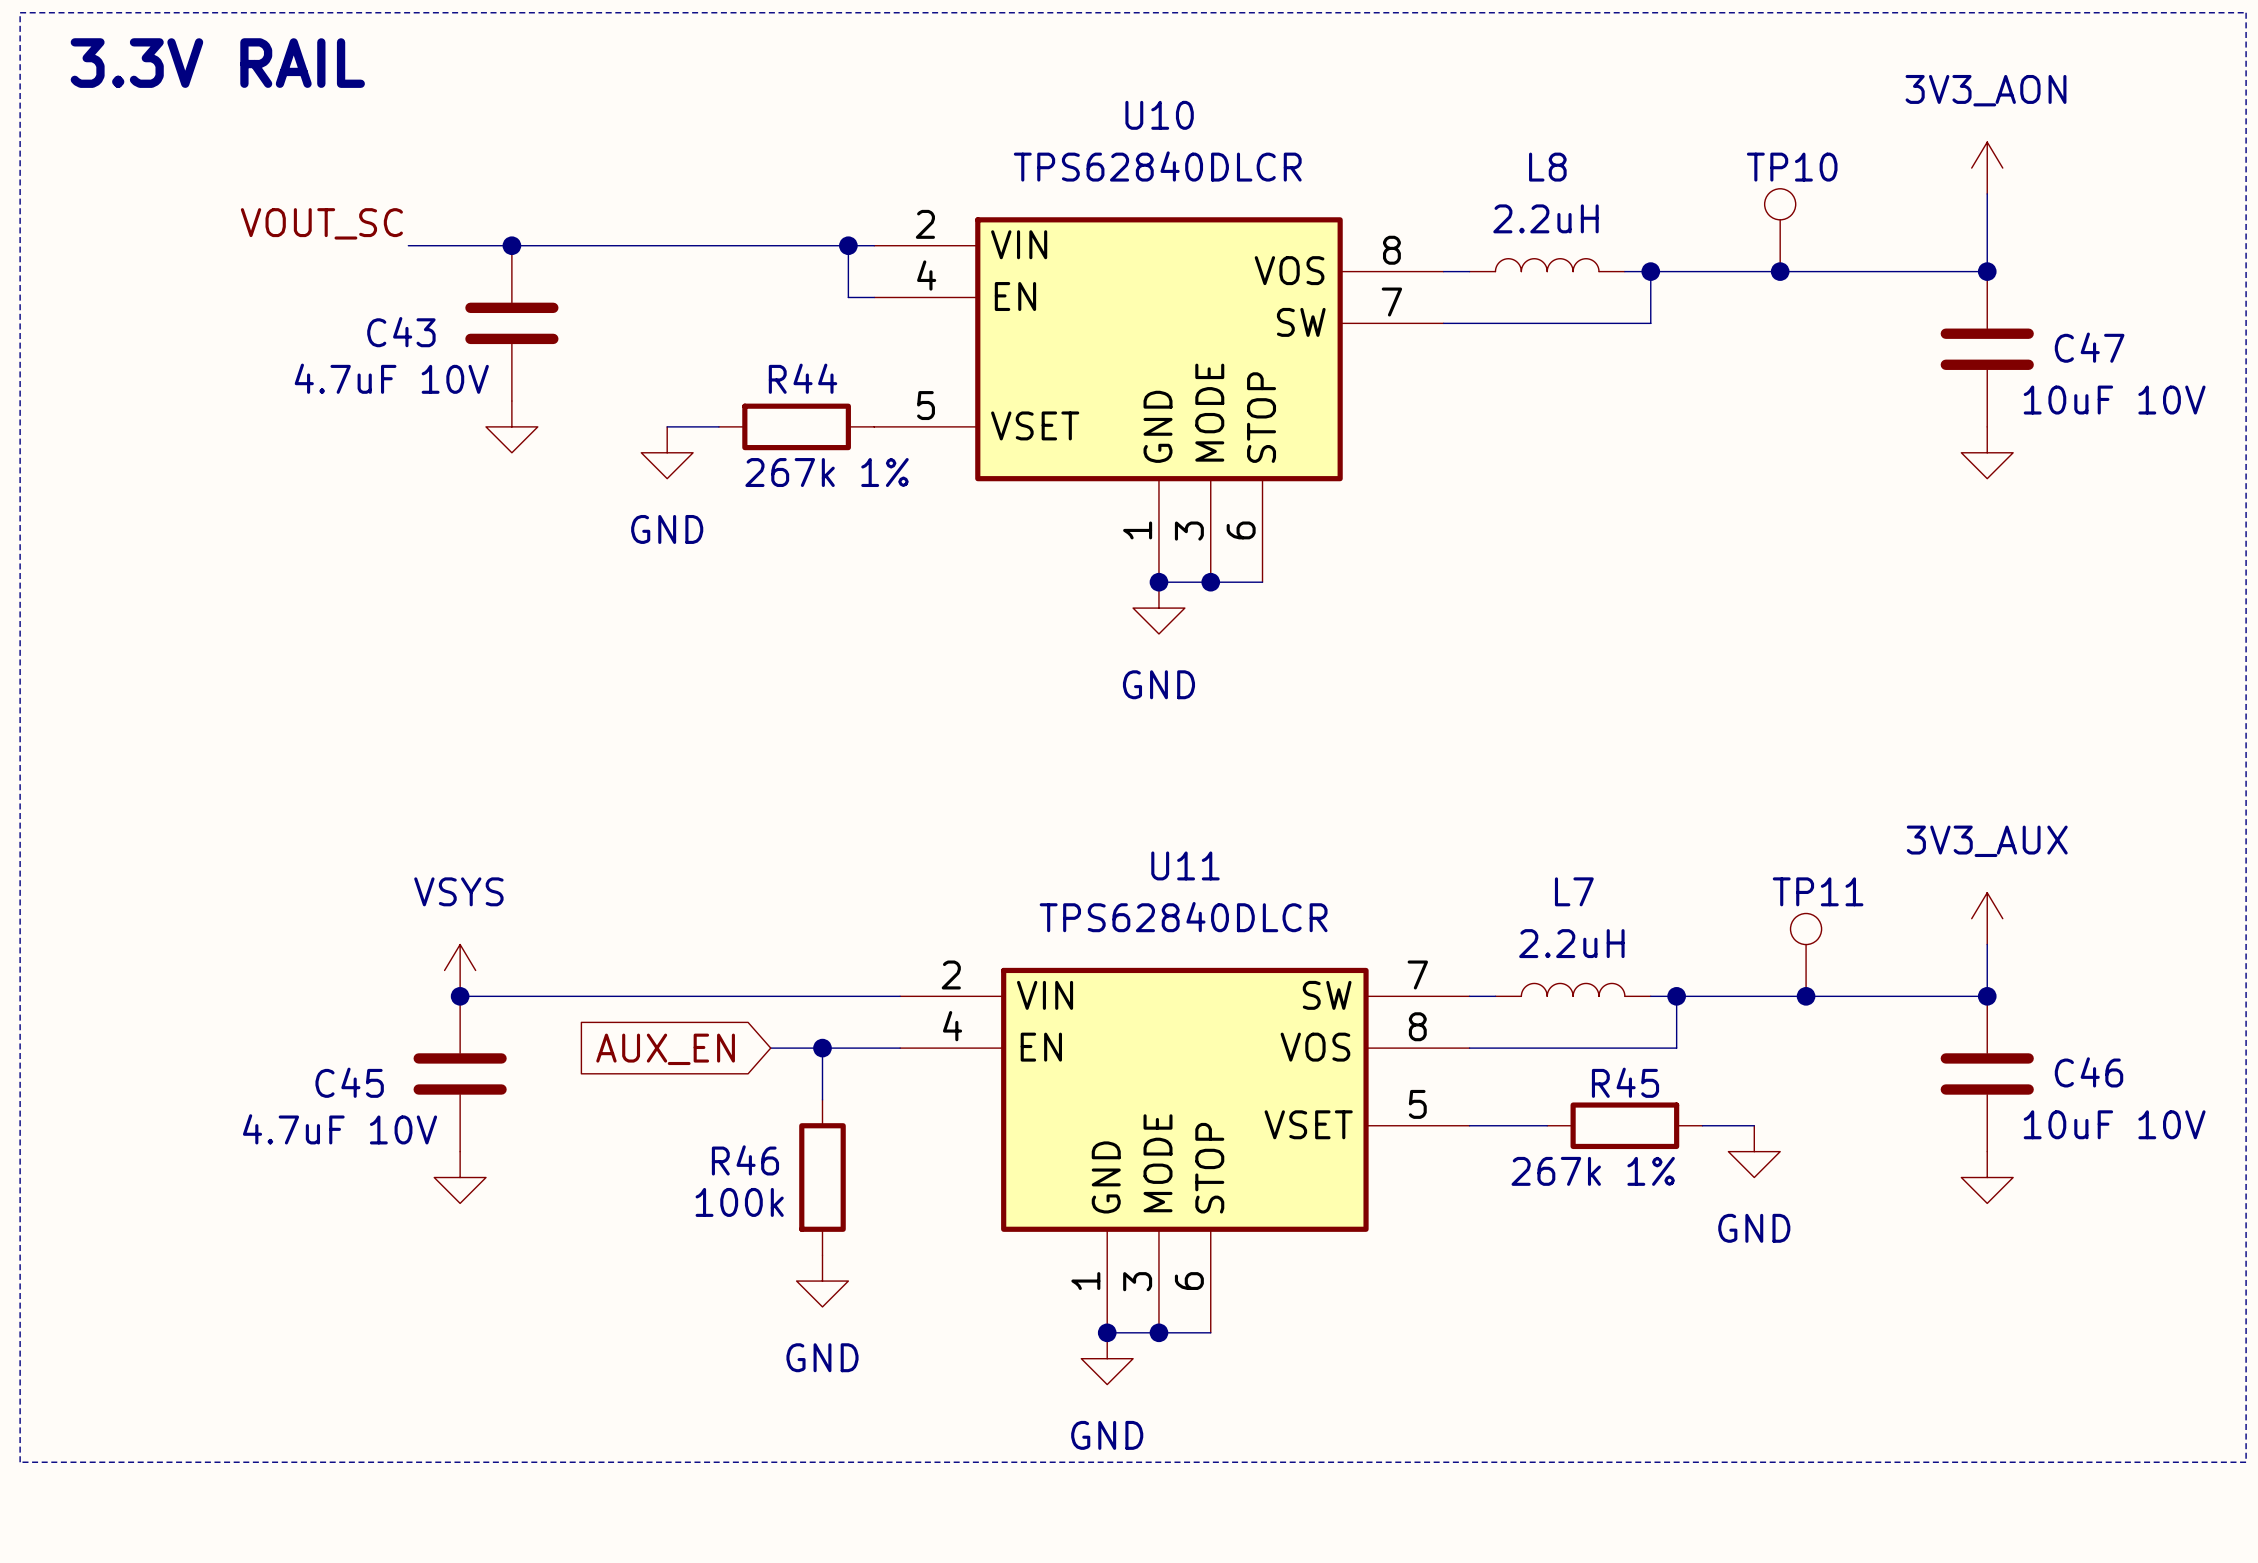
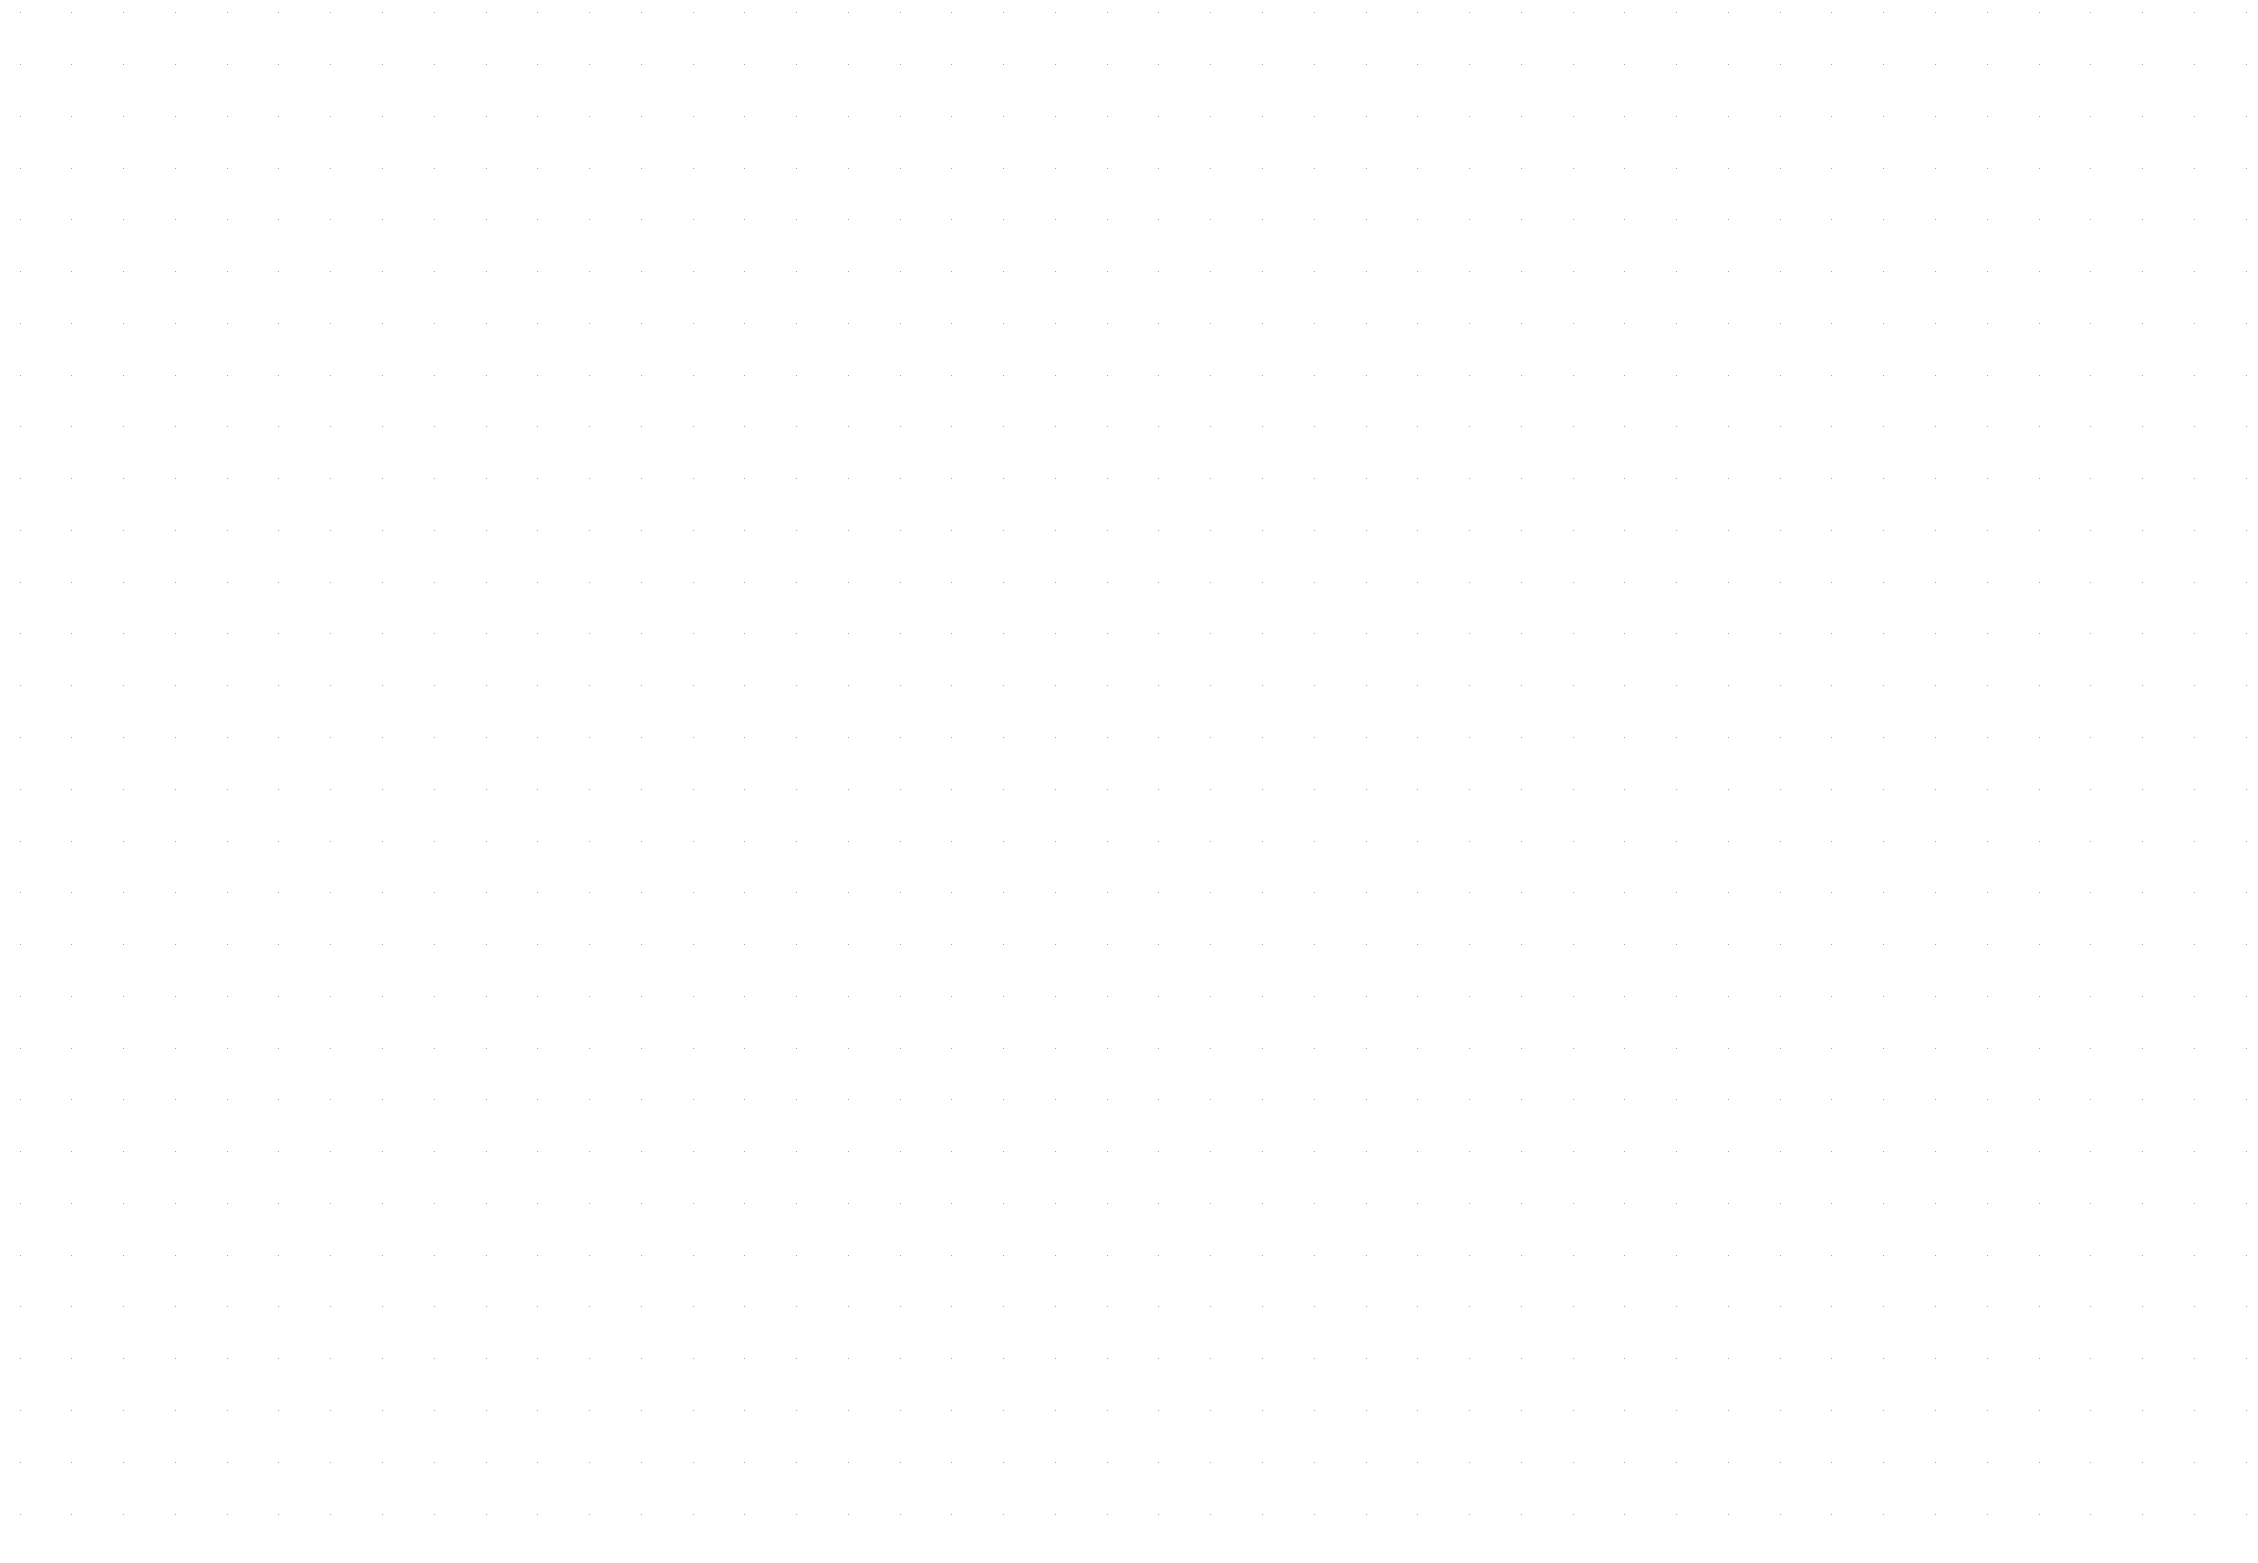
line: (20, 12) (2246, 12) (2246, 1462) (20, 1462) (20, 12) -> none
text: 3.3V RAIL (217, 63) -> none
power symbol: 3V3_AON (1987, 168) -> none
wire: (1987, 193) (1987, 271) (1624, 271) -> none
label: VOUT_SC (321, 223) -> none
TP10: (1780, 230) -> none
wire: (408, 245) (874, 245) -> none
junction: (511, 245) -> none
wire: (848, 245) (848, 297) (874, 297) -> none
junction: (848, 245) -> none
L8: 2.2uH (1547, 265) -> none
wire: (1443, 271) (1469, 271) -> none
wire: (1650, 271) (1650, 323) (1443, 323) -> none
junction: (1650, 271) -> none
junction: (1780, 271) -> none
junction: (1987, 271) -> none
C43: 4.7uF 10V (511, 323) -> none
C47: 10uF 10V (1987, 349) -> none
U10: TPS62840DLCR (1158, 399) -> none
power symbol: (511, 426) -> none
wire: (667, 426) (718, 426) -> none
R44: 267k 1% (796, 426) -> none
power symbol: GND (667, 452) -> none
power symbol: (1987, 452) -> none
wire: (1158, 582) (1262, 582) -> none
junction: (1158, 582) -> none
junction: (1210, 582) -> none
power symbol: GND (1158, 608) -> none
power symbol: 3V3_AUX (1987, 918) -> none
wire: (1987, 944) (1987, 996) (1650, 996) -> none
TP11: (1806, 954) -> none
power symbol: VSYS (460, 970) -> none
L7: 2.2uH (1573, 989) -> none
wire: (460, 996) (900, 996) -> none
junction: (460, 996) -> none
wire: (1469, 996) (1495, 996) -> none
wire: (1676, 996) (1676, 1048) (1469, 1048) -> none
junction: (1676, 996) -> none
junction: (1806, 996) -> none
junction: (1987, 996) -> none
wire: (770, 1048) (900, 1048) -> none
wire: (822, 1048) (822, 1099) -> none
junction: (822, 1048) -> none
global label: AUX_EN (665, 1049) -> none
C45: 4.7uF 10V (460, 1073) -> none
C46: 10uF 10V (1987, 1073) -> none
wire: (1469, 1125) (1547, 1125) -> none
R45: 267k 1% (1624, 1125) -> none
wire: (1702, 1125) (1754, 1125) -> none
U11: TPS62840DLCR (1184, 1150) -> none
power symbol: GND (1754, 1151) -> none
power symbol: (460, 1177) -> none
R46: 100k (822, 1177) -> none
power symbol: (1987, 1177) -> none
power symbol: GND (822, 1281) -> none
wire: (1107, 1332) (1210, 1332) -> none
junction: (1107, 1332) -> none
junction: (1158, 1332) -> none
power symbol: GND (1107, 1358) -> none

